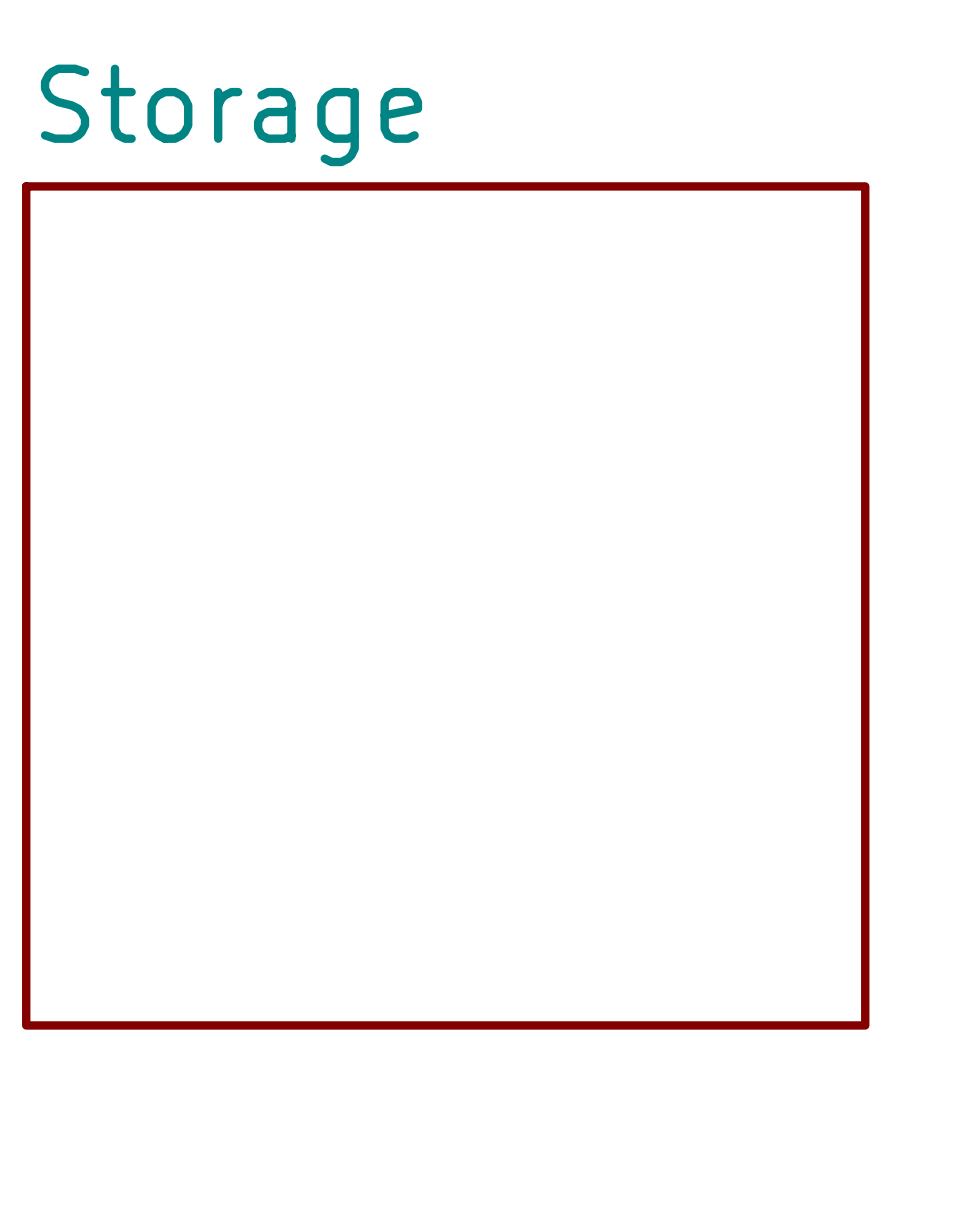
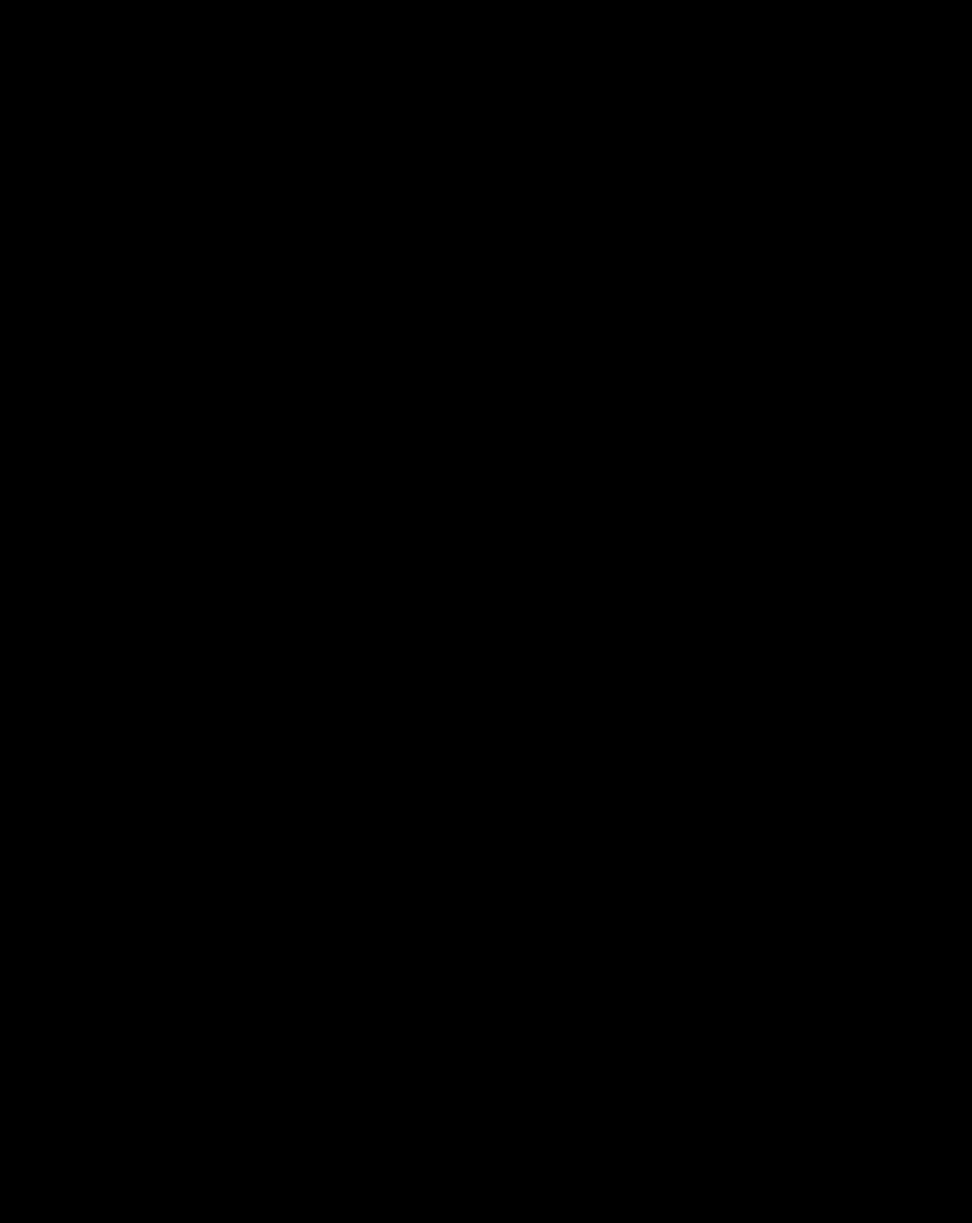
sheet Storage: (445, 605) -> none

